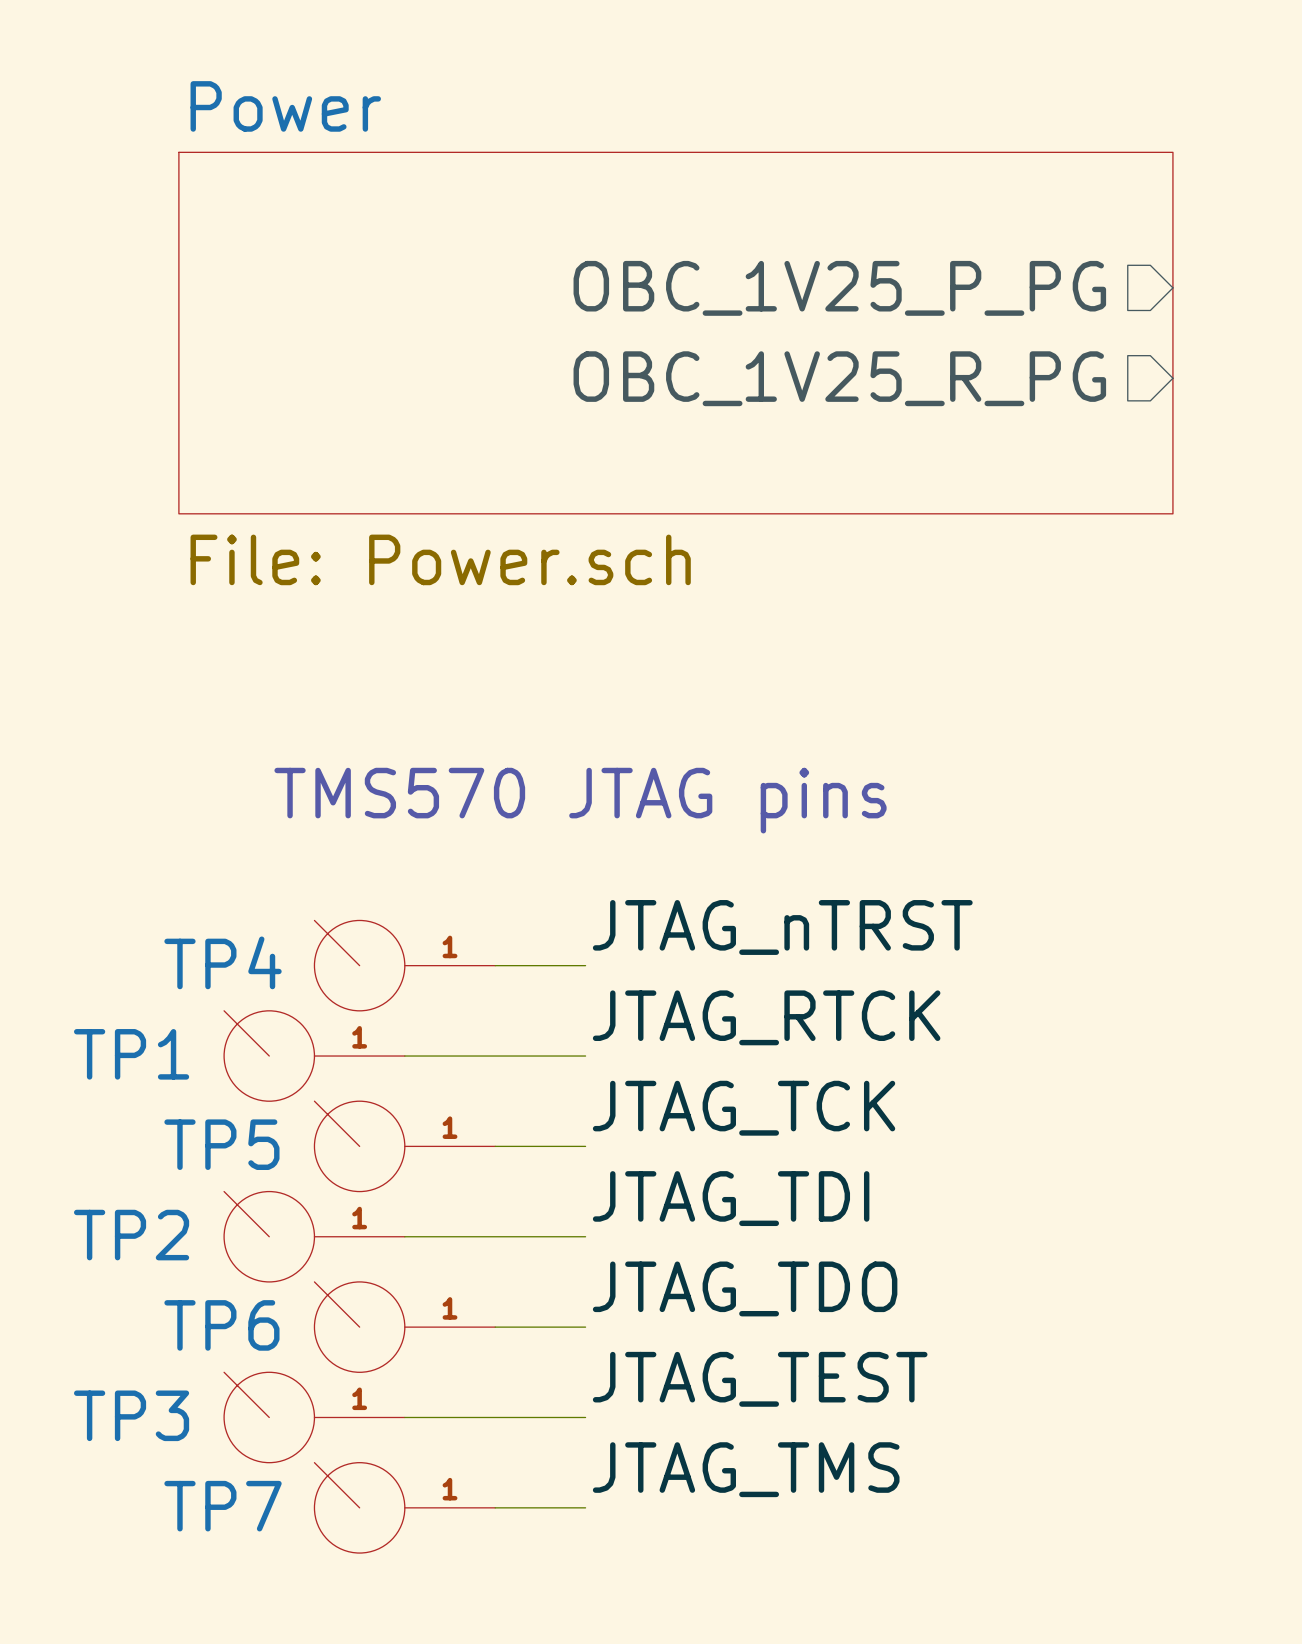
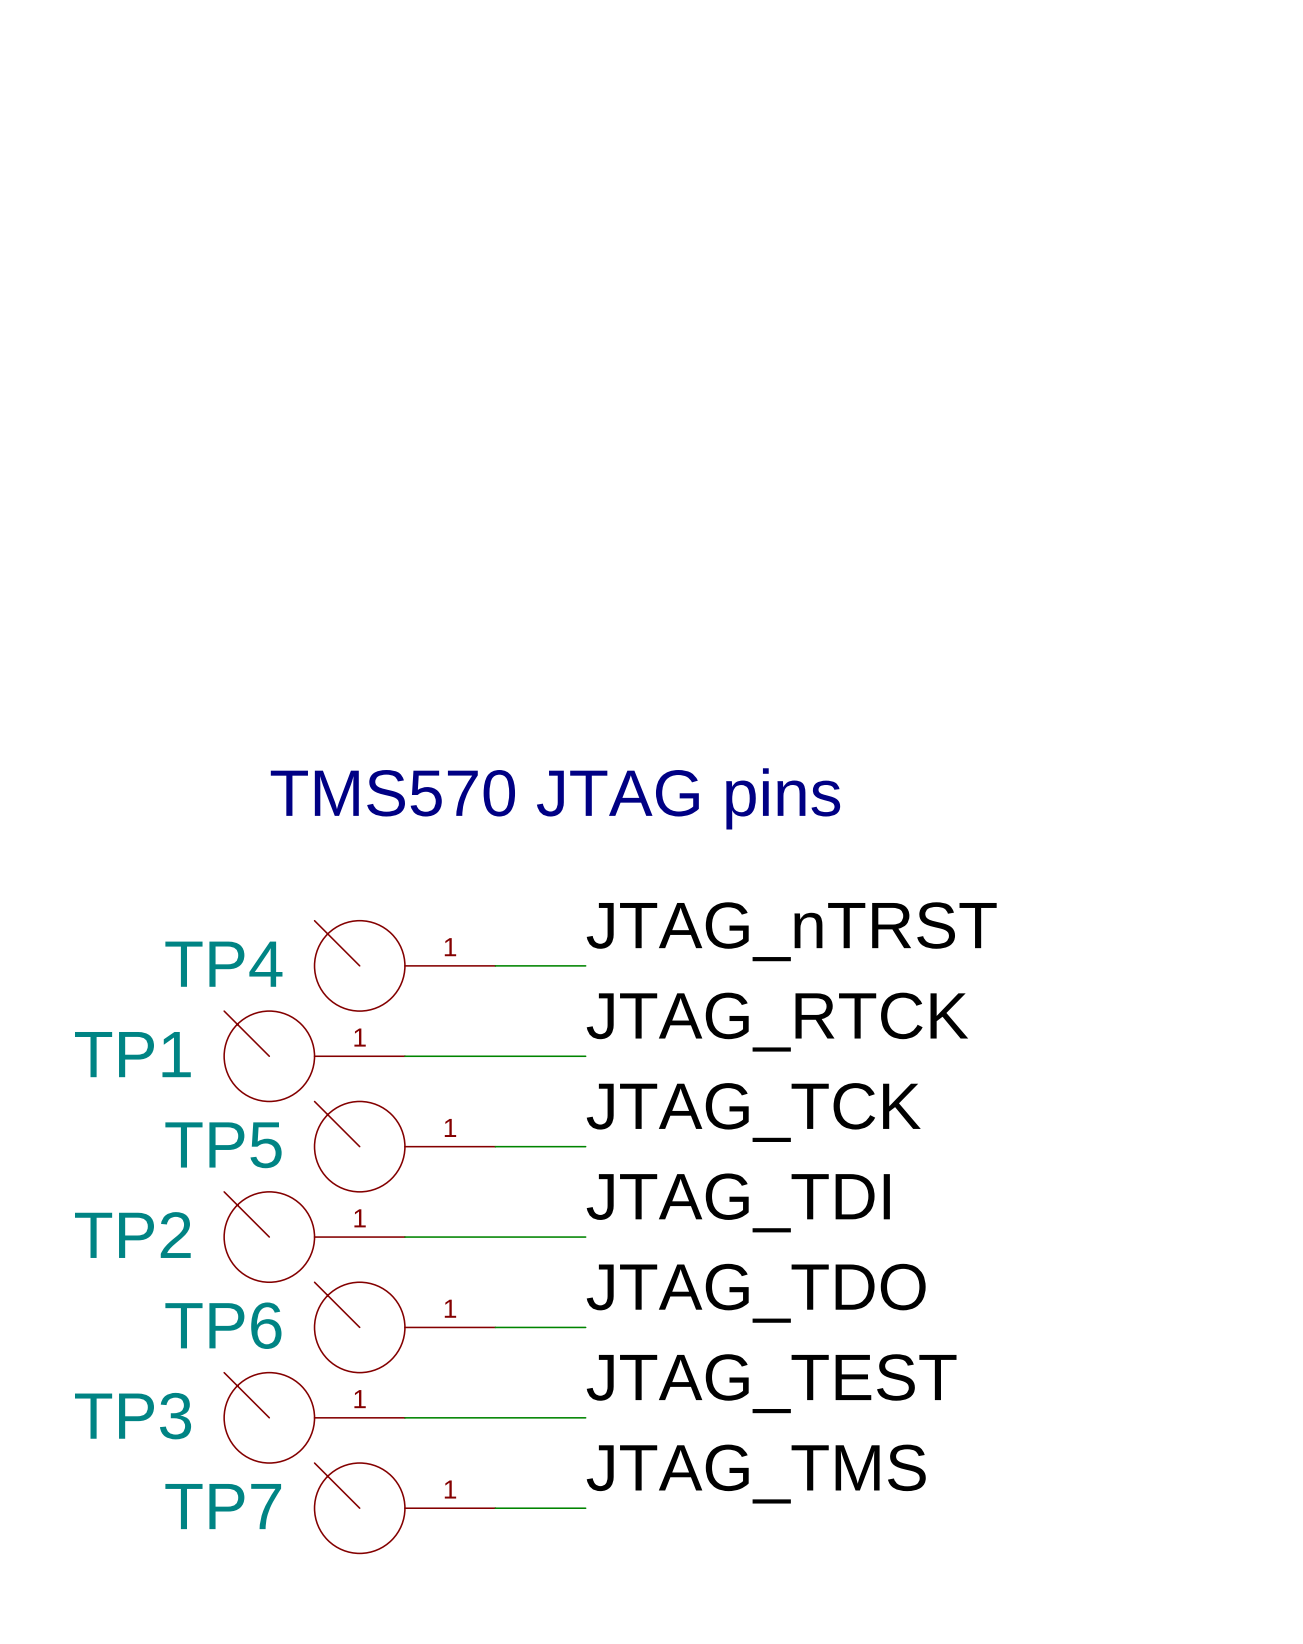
sheet pin: OBC_1V25_P_PG (839, 288) -> none
sheet Power: File: Power.sch (675, 333) -> none
sheet pin: OBC_1V25_R_PG (839, 378) -> none

